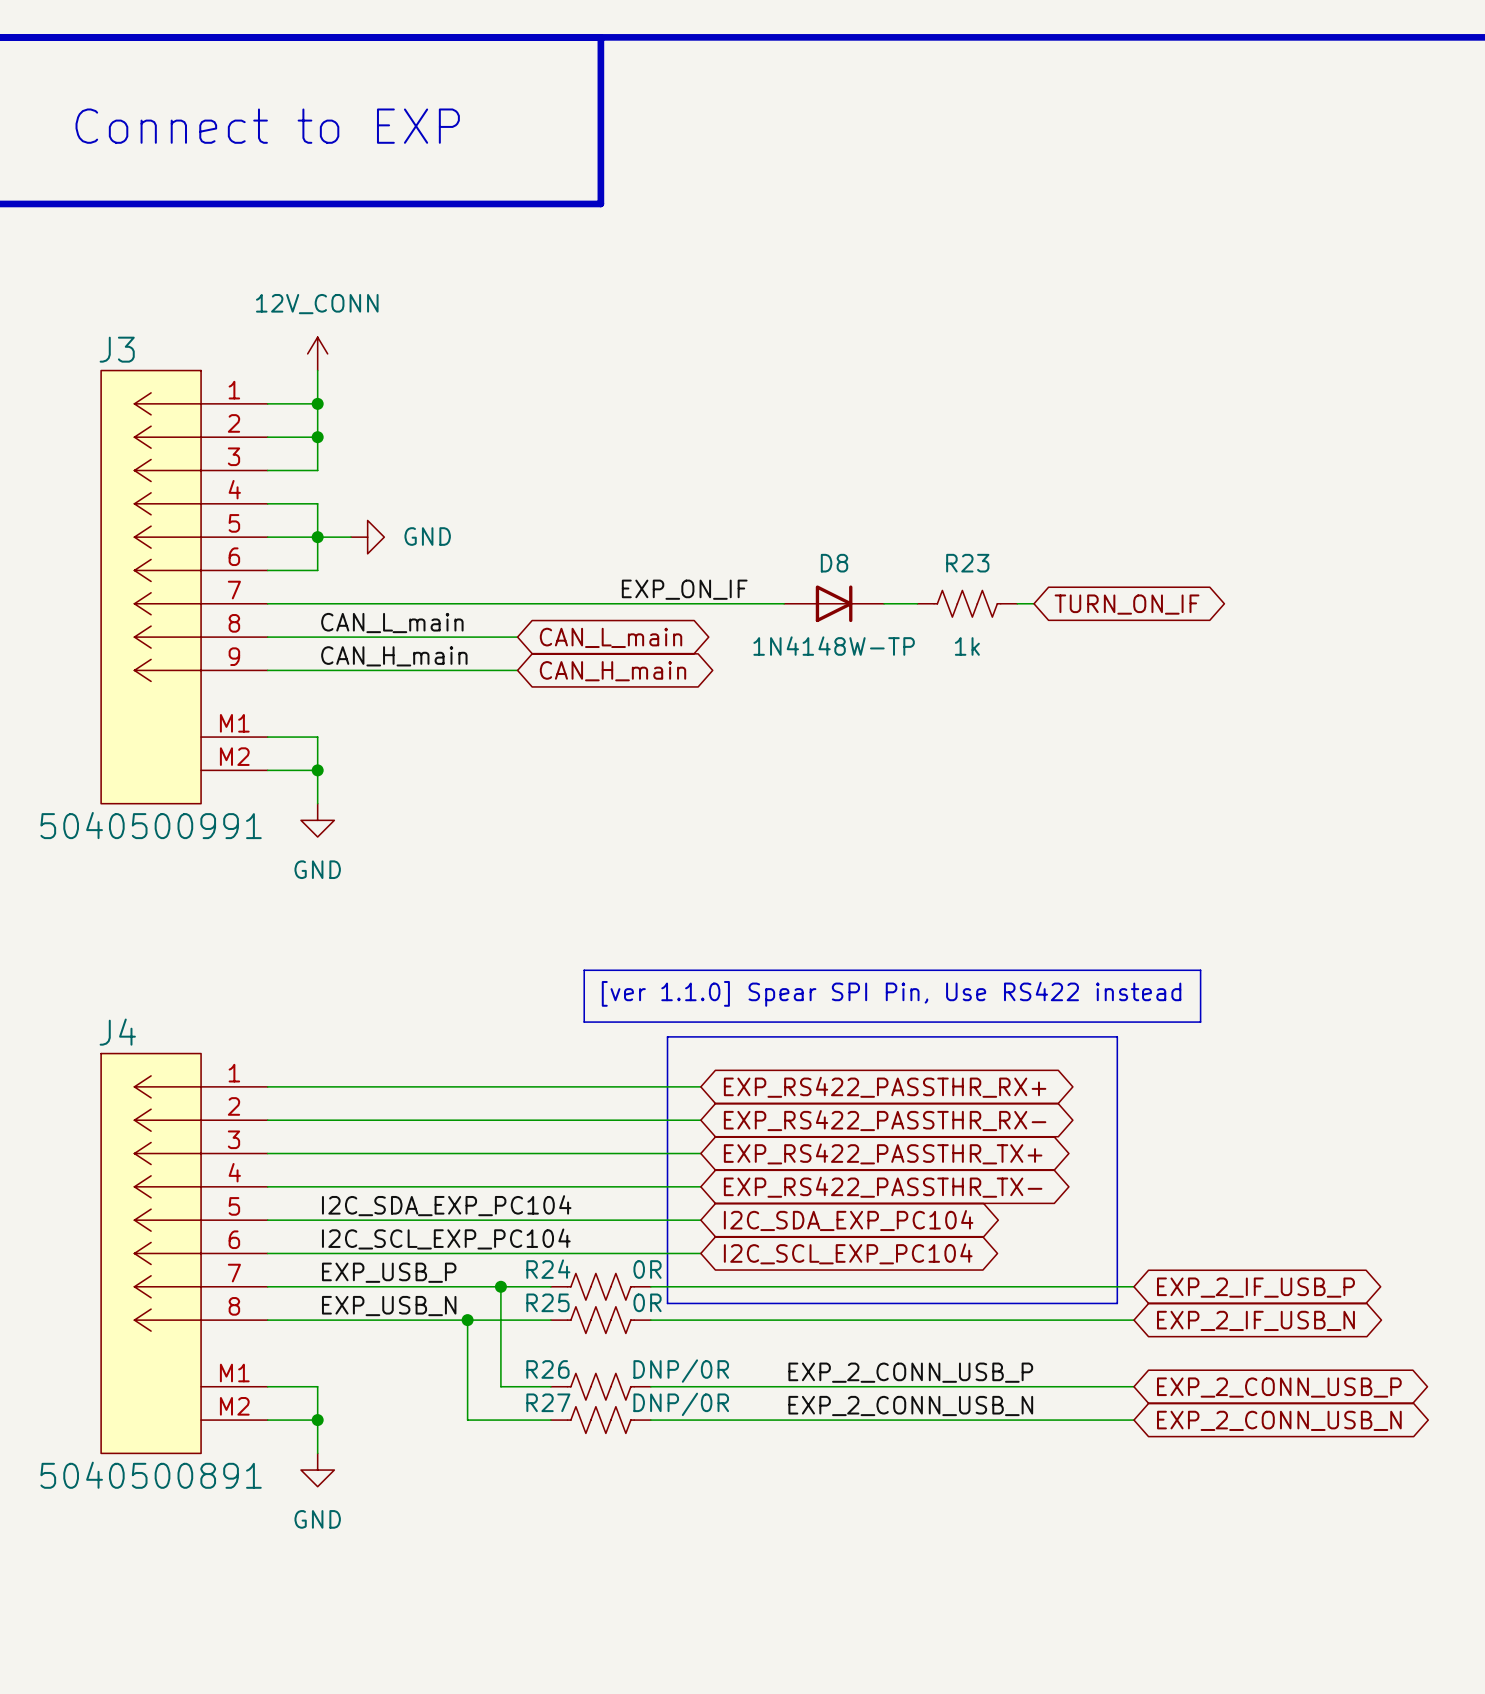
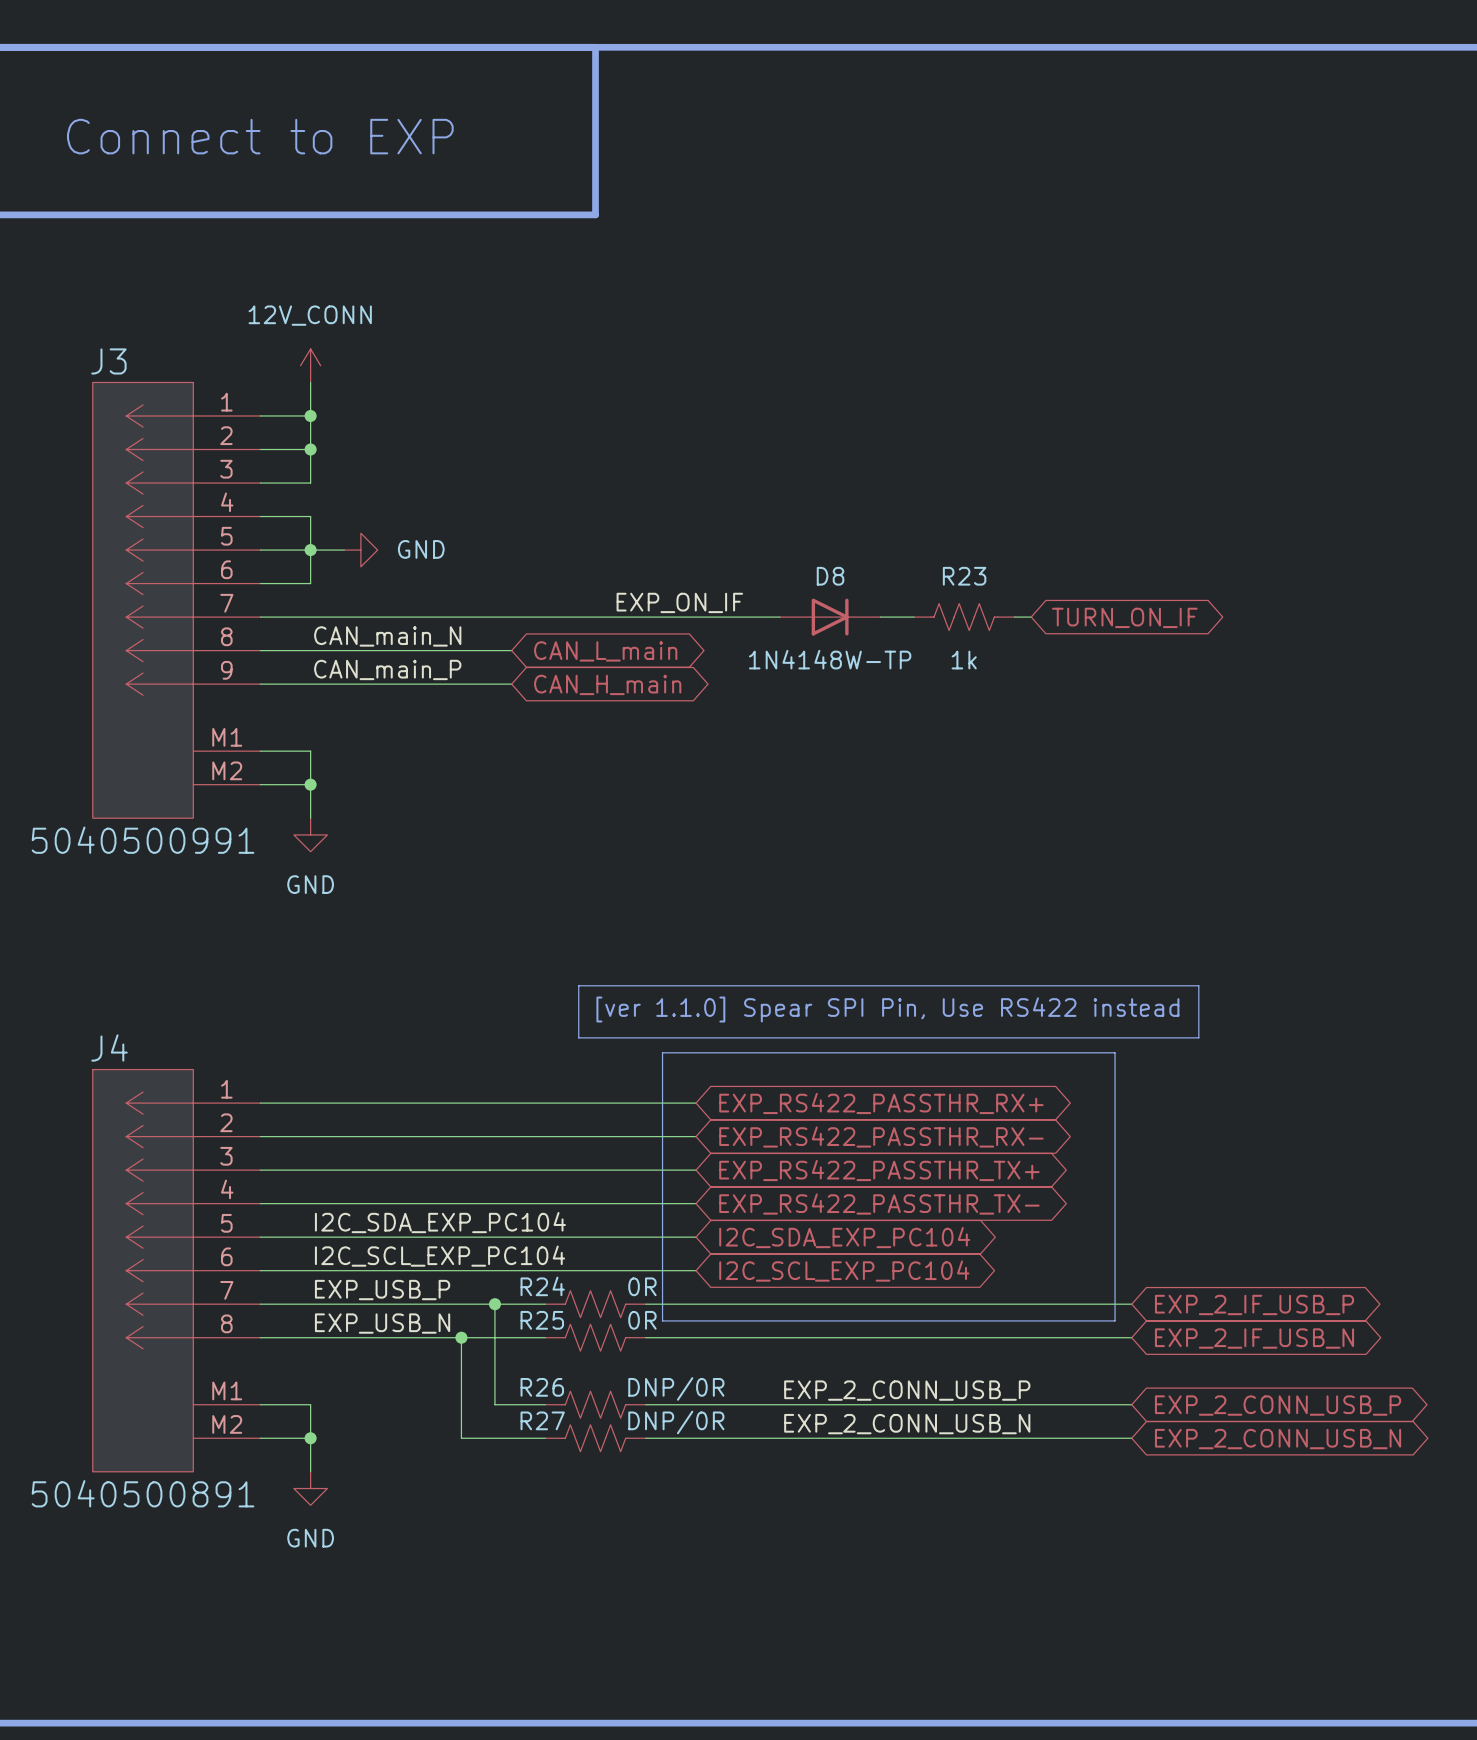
label: CAN_L_main (392, 623) -> CAN_main_N (387, 636)
label: CAN_H_main (394, 656) -> CAN_main_P (387, 669)

